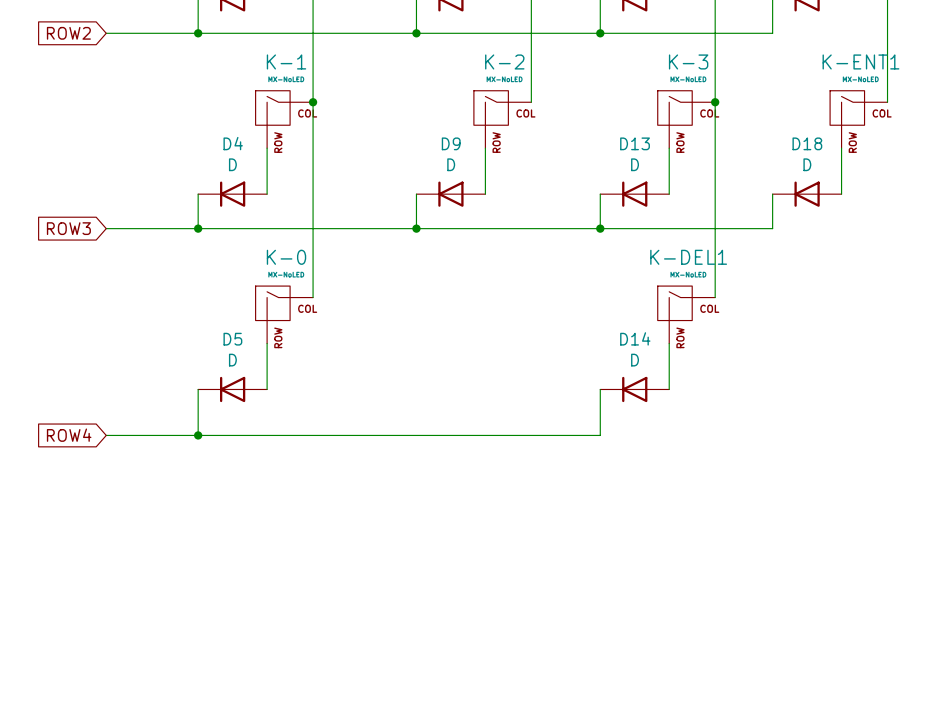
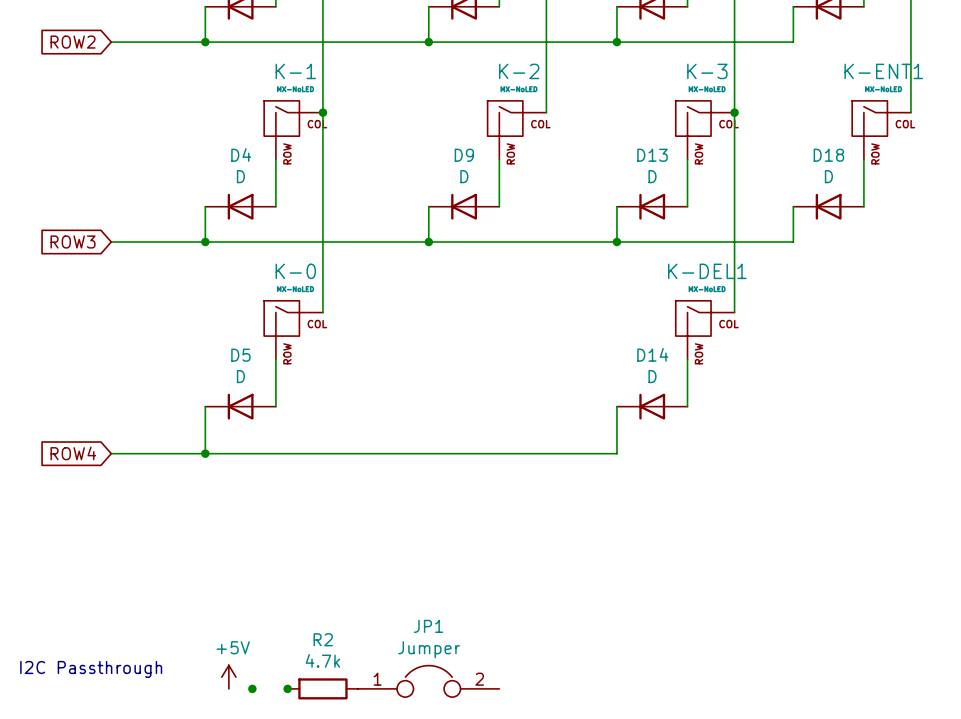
text: none -> I2C Passthrough (91, 669)
power symbol: none -> +5V (228, 677)
JP1: none -> Jumper (428, 681)
junction: none -> (252, 688)
junction: none -> (287, 688)
R2: none -> 4.7k (322, 688)

